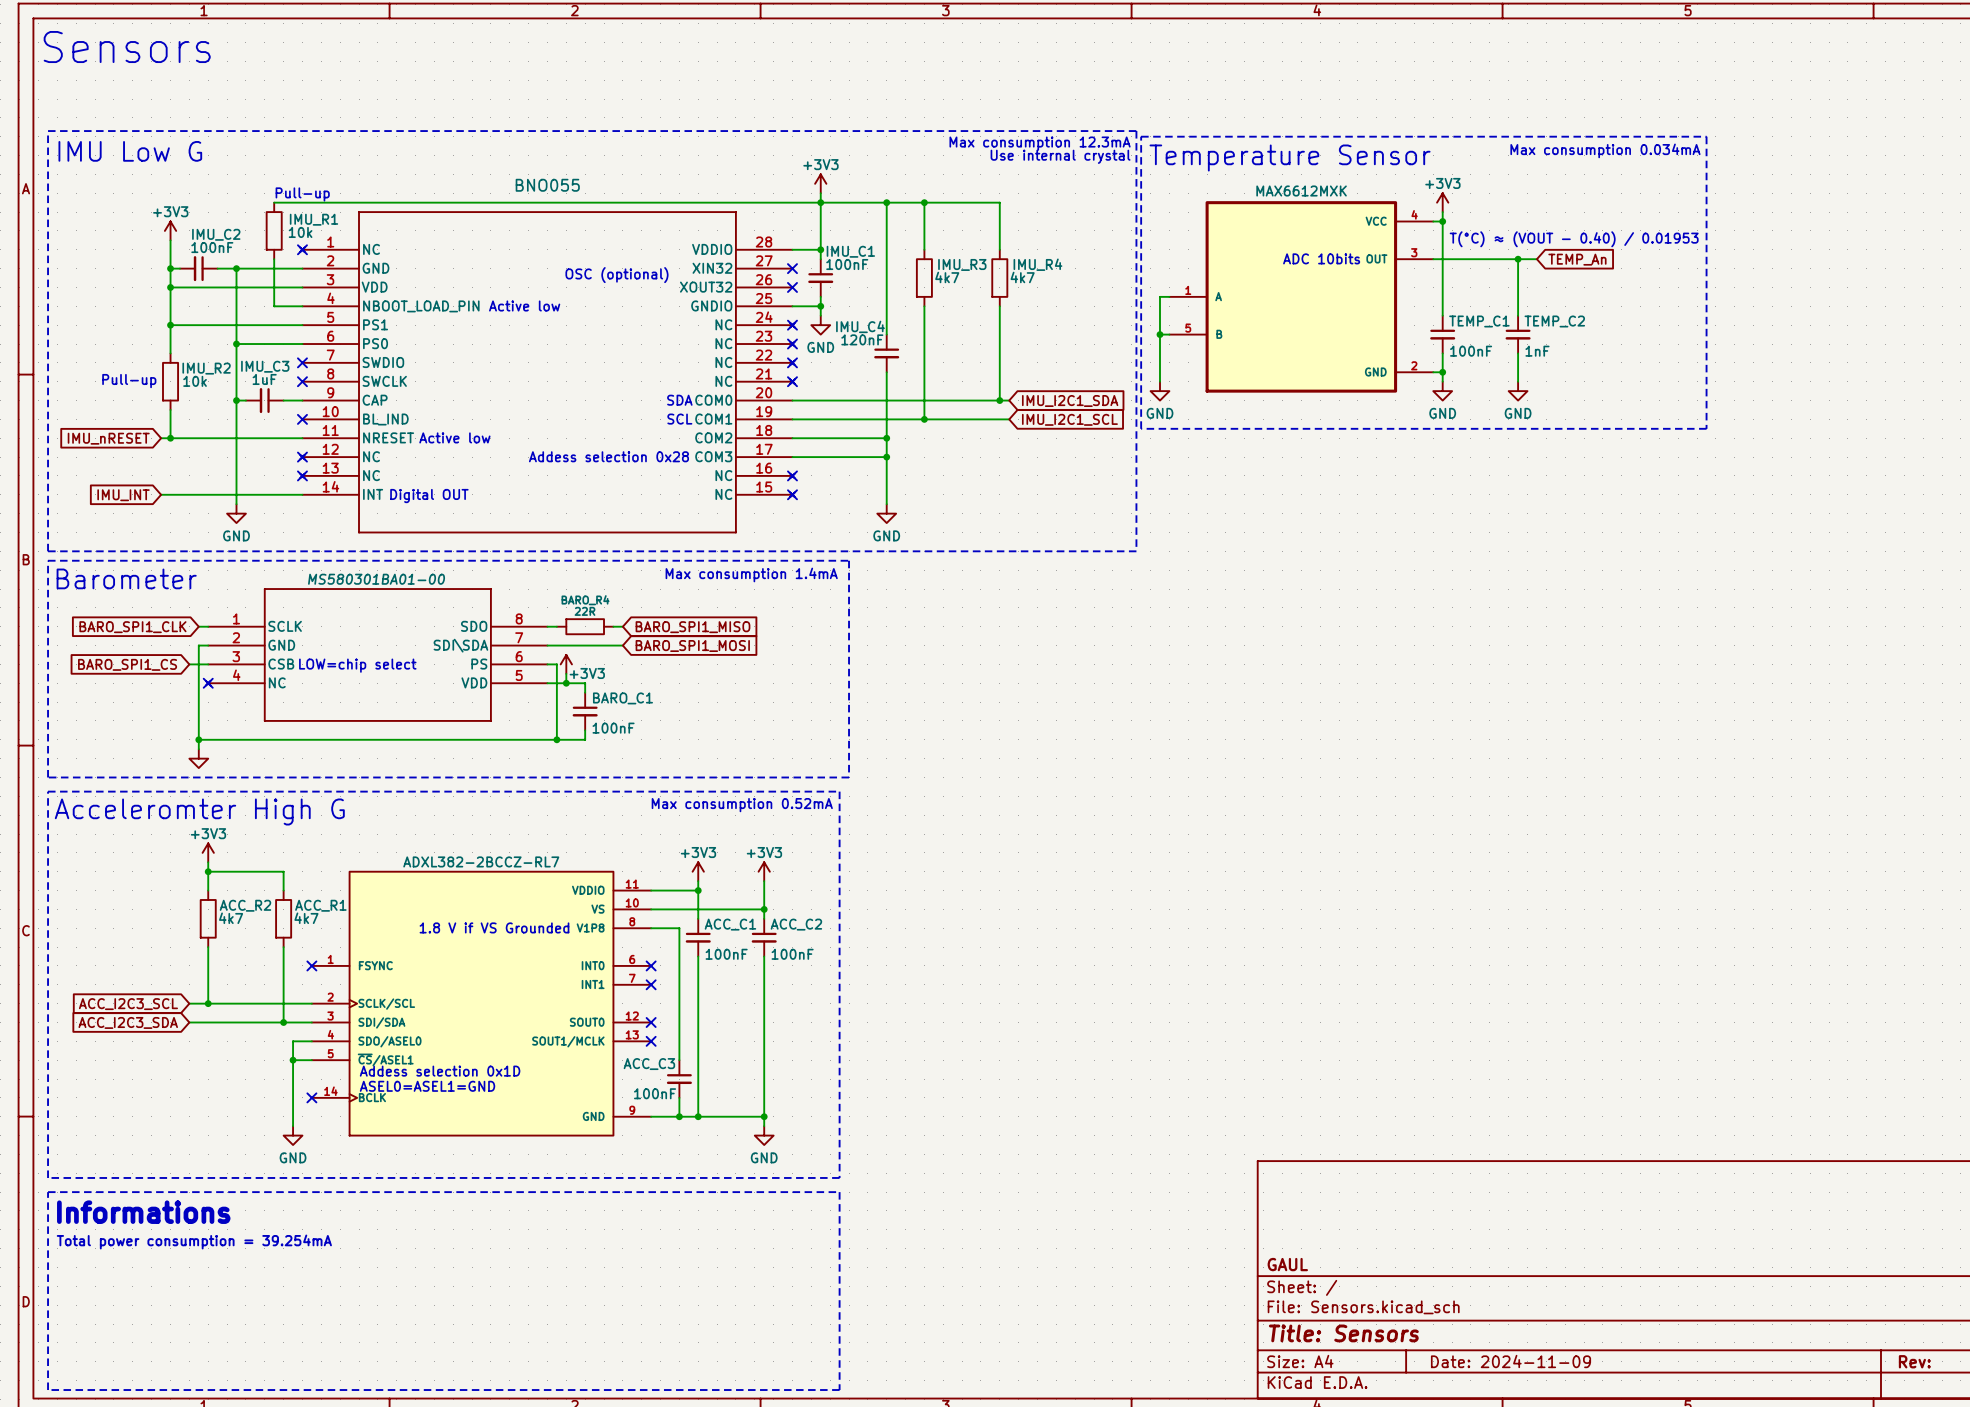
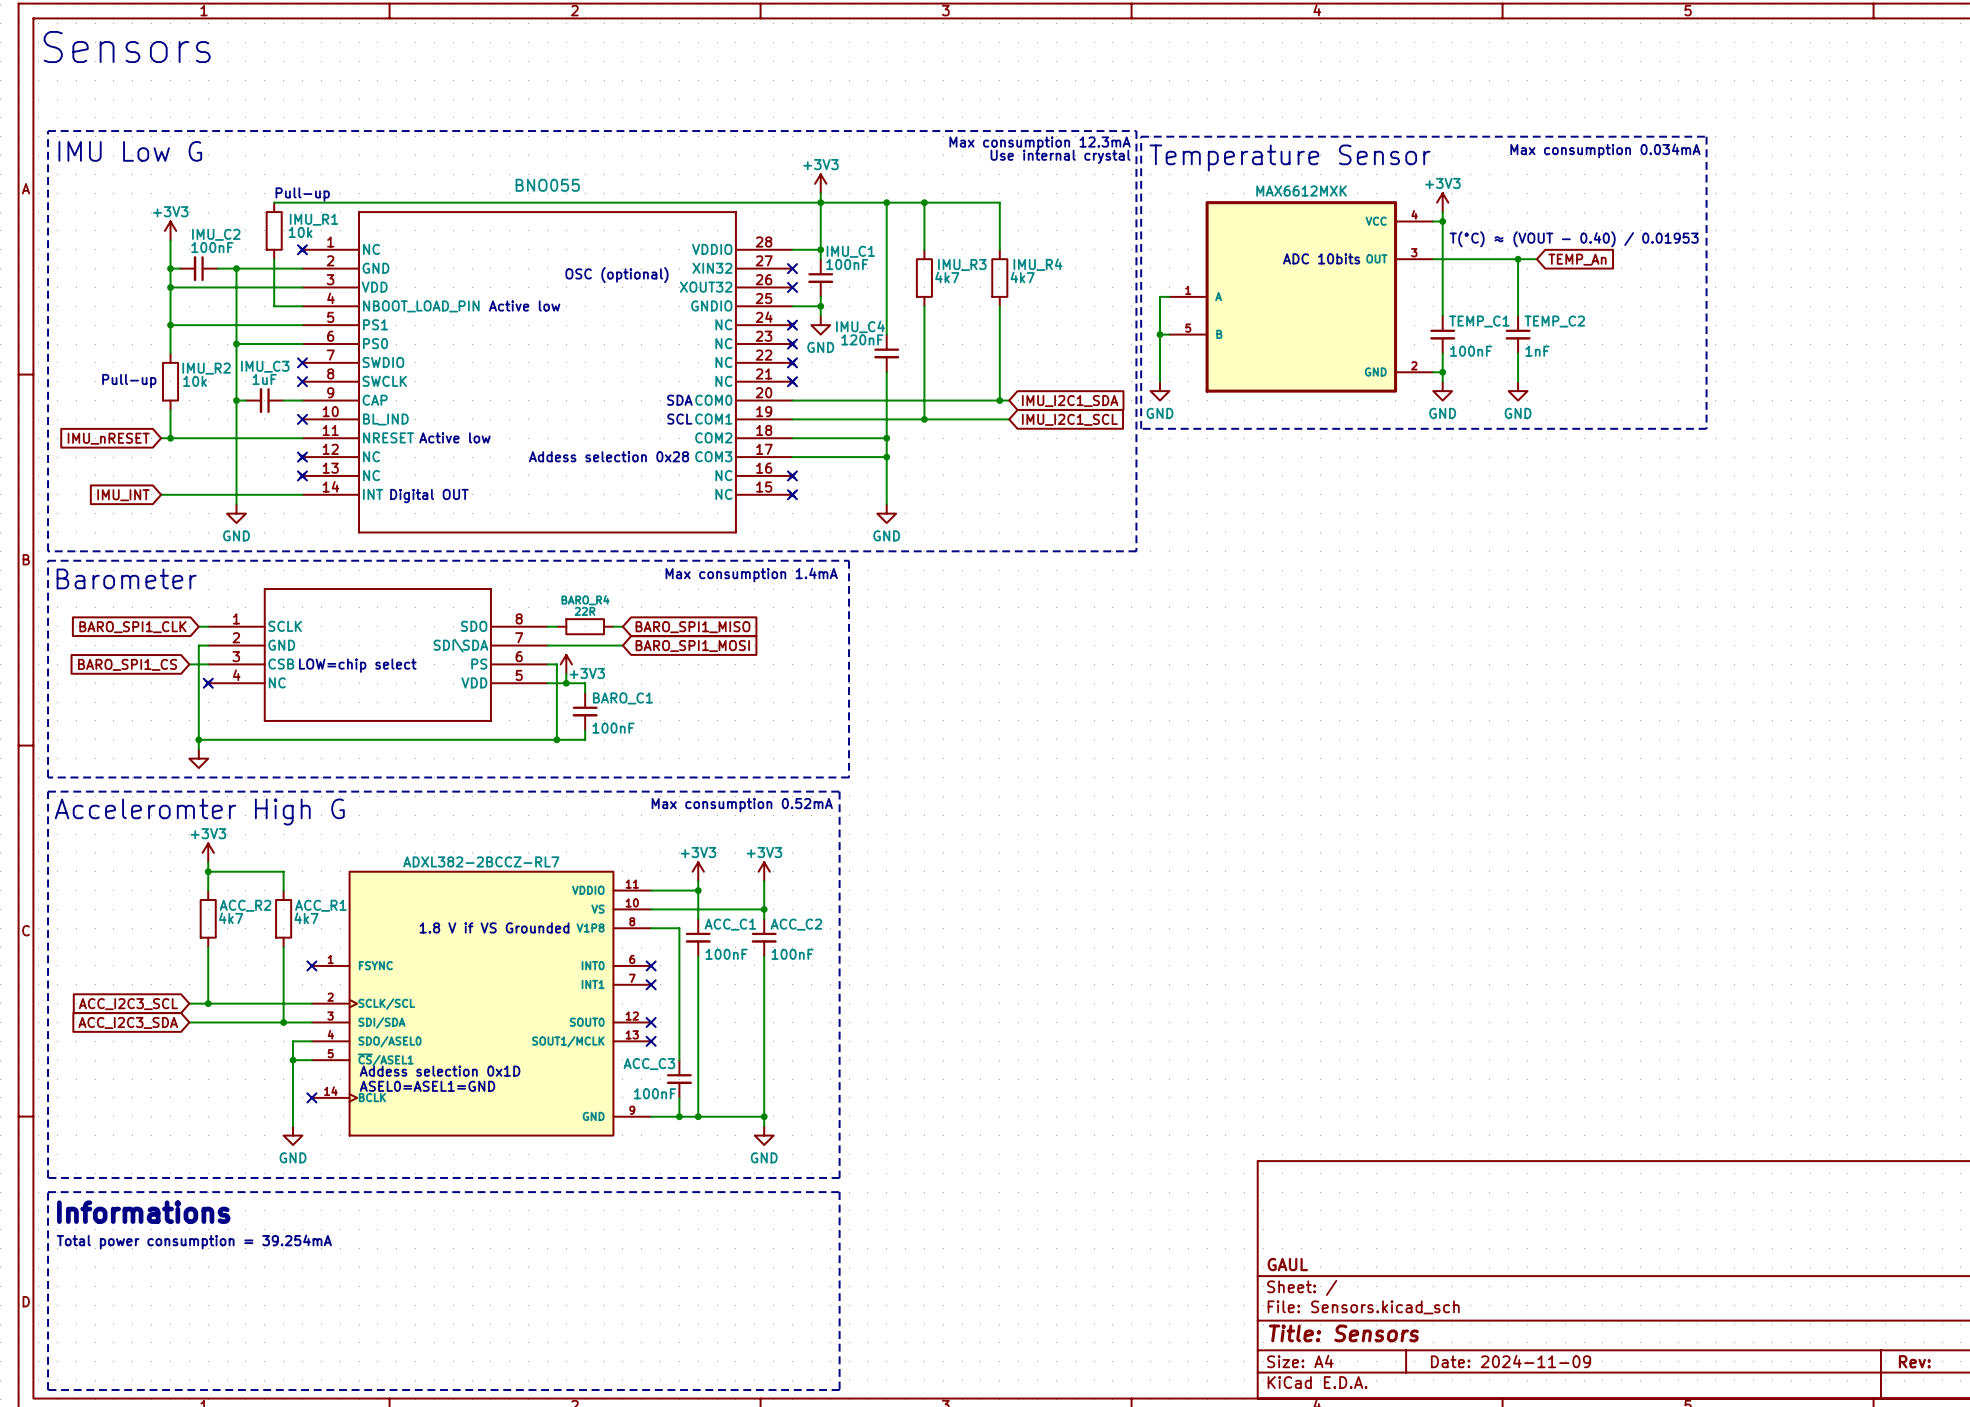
part text: MS580301BA01-00 (376, 579) -> none

